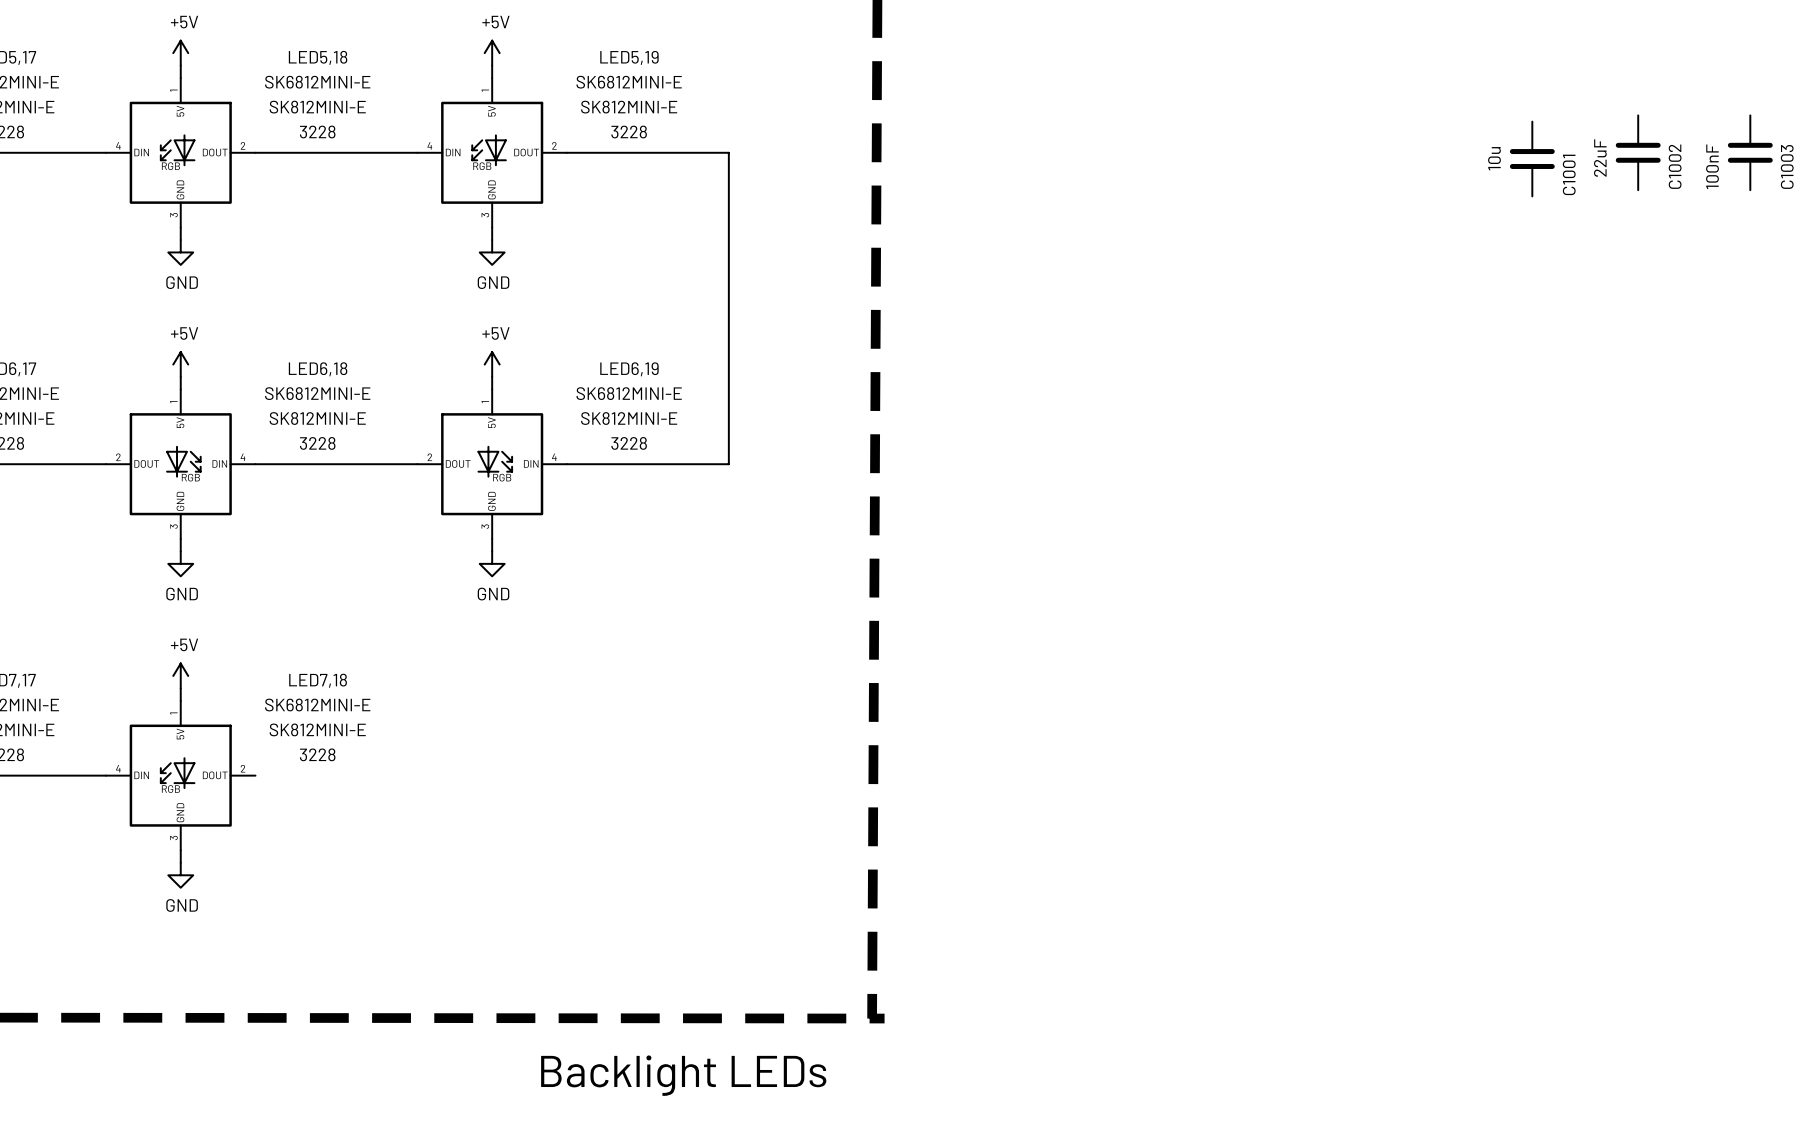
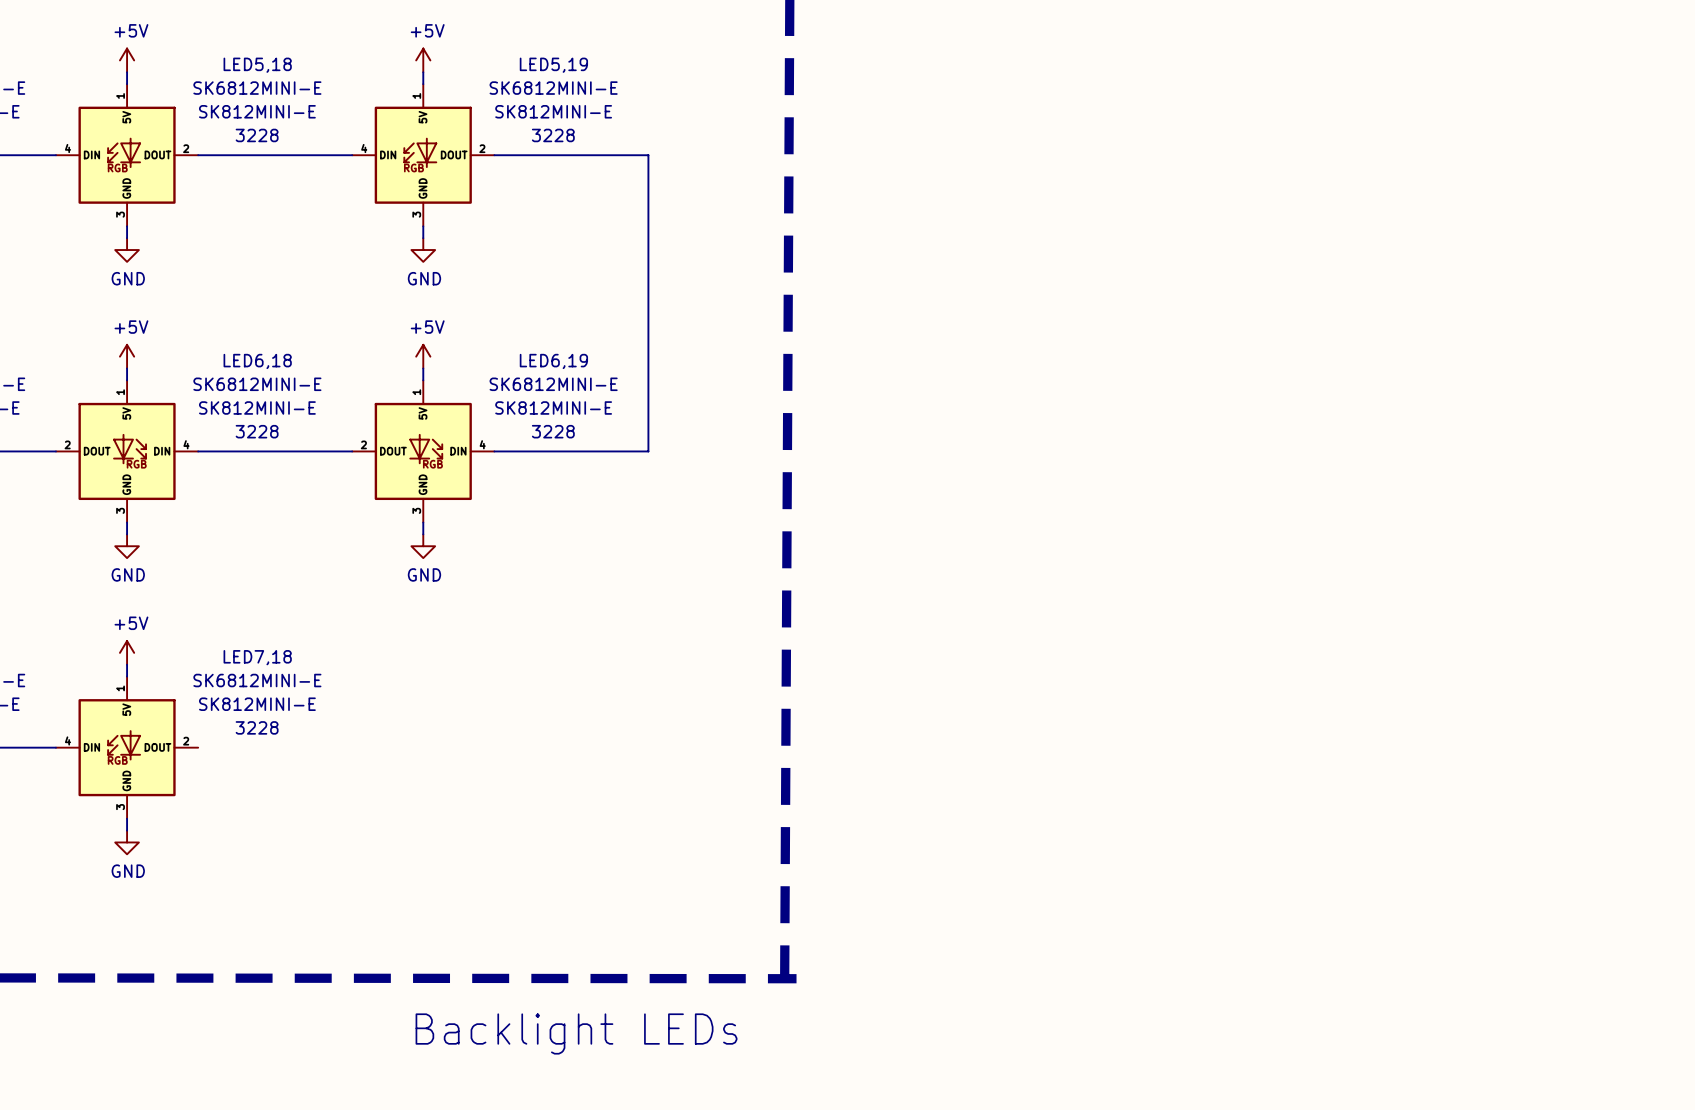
C1002: 22uF (1638, 152) -> none
C1003: 100nF (1750, 152) -> none
C1001: 10u (1532, 159) -> none

